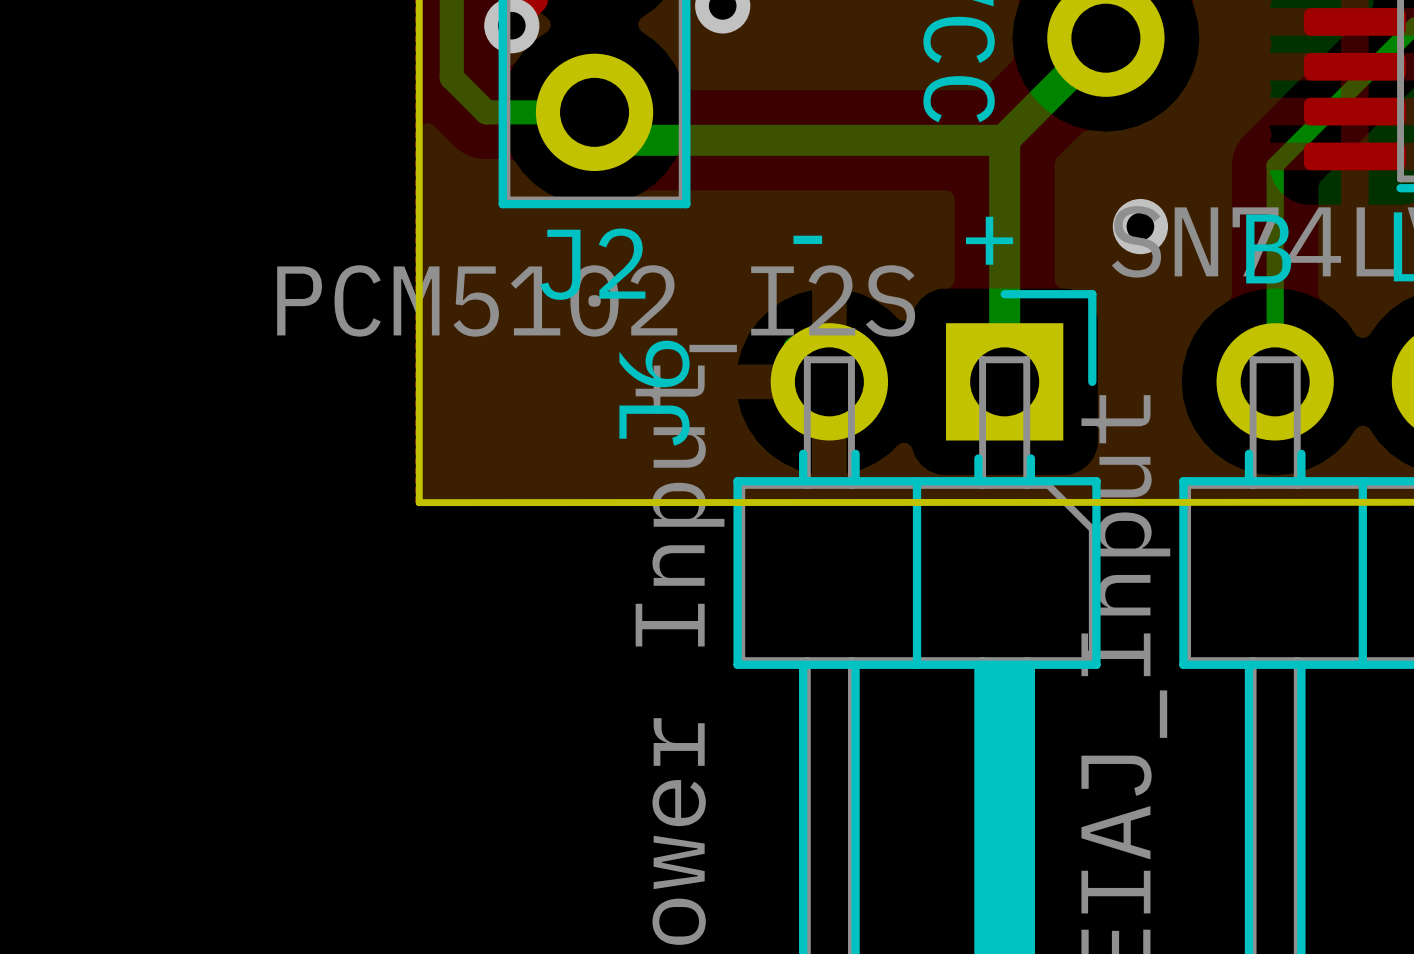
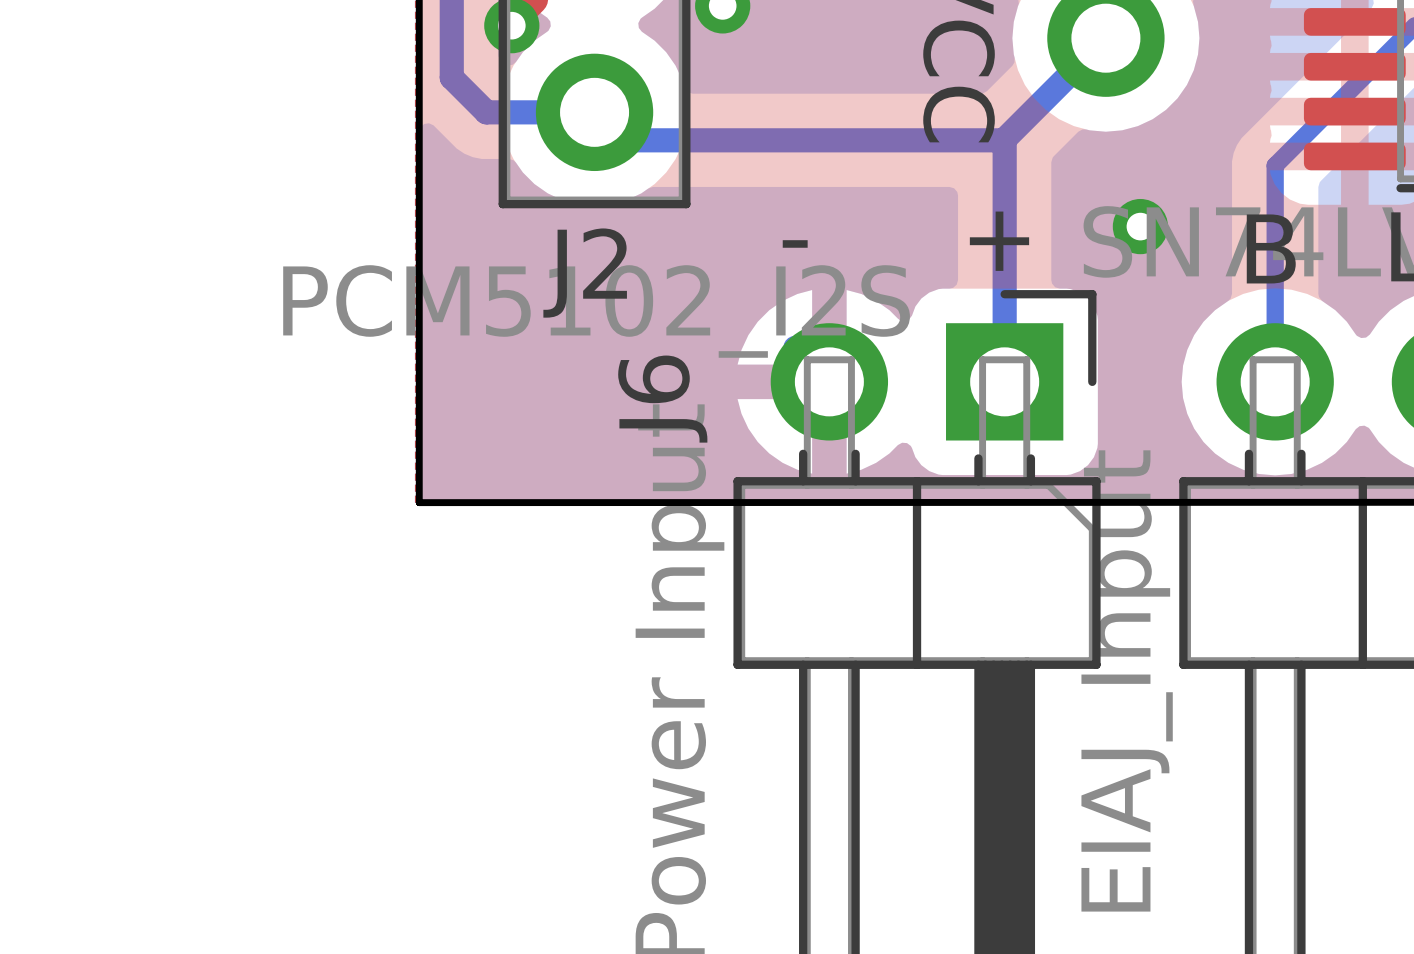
bottom track width: thick (1105, 38) (1004, 139) (1004, 381) -> thin (1105, 38) (1004, 139) (1004, 381)
bottom track width: thick (594, 112) (622, 140) (1003, 140) -> thin (594, 112) (622, 140) (1003, 140)

